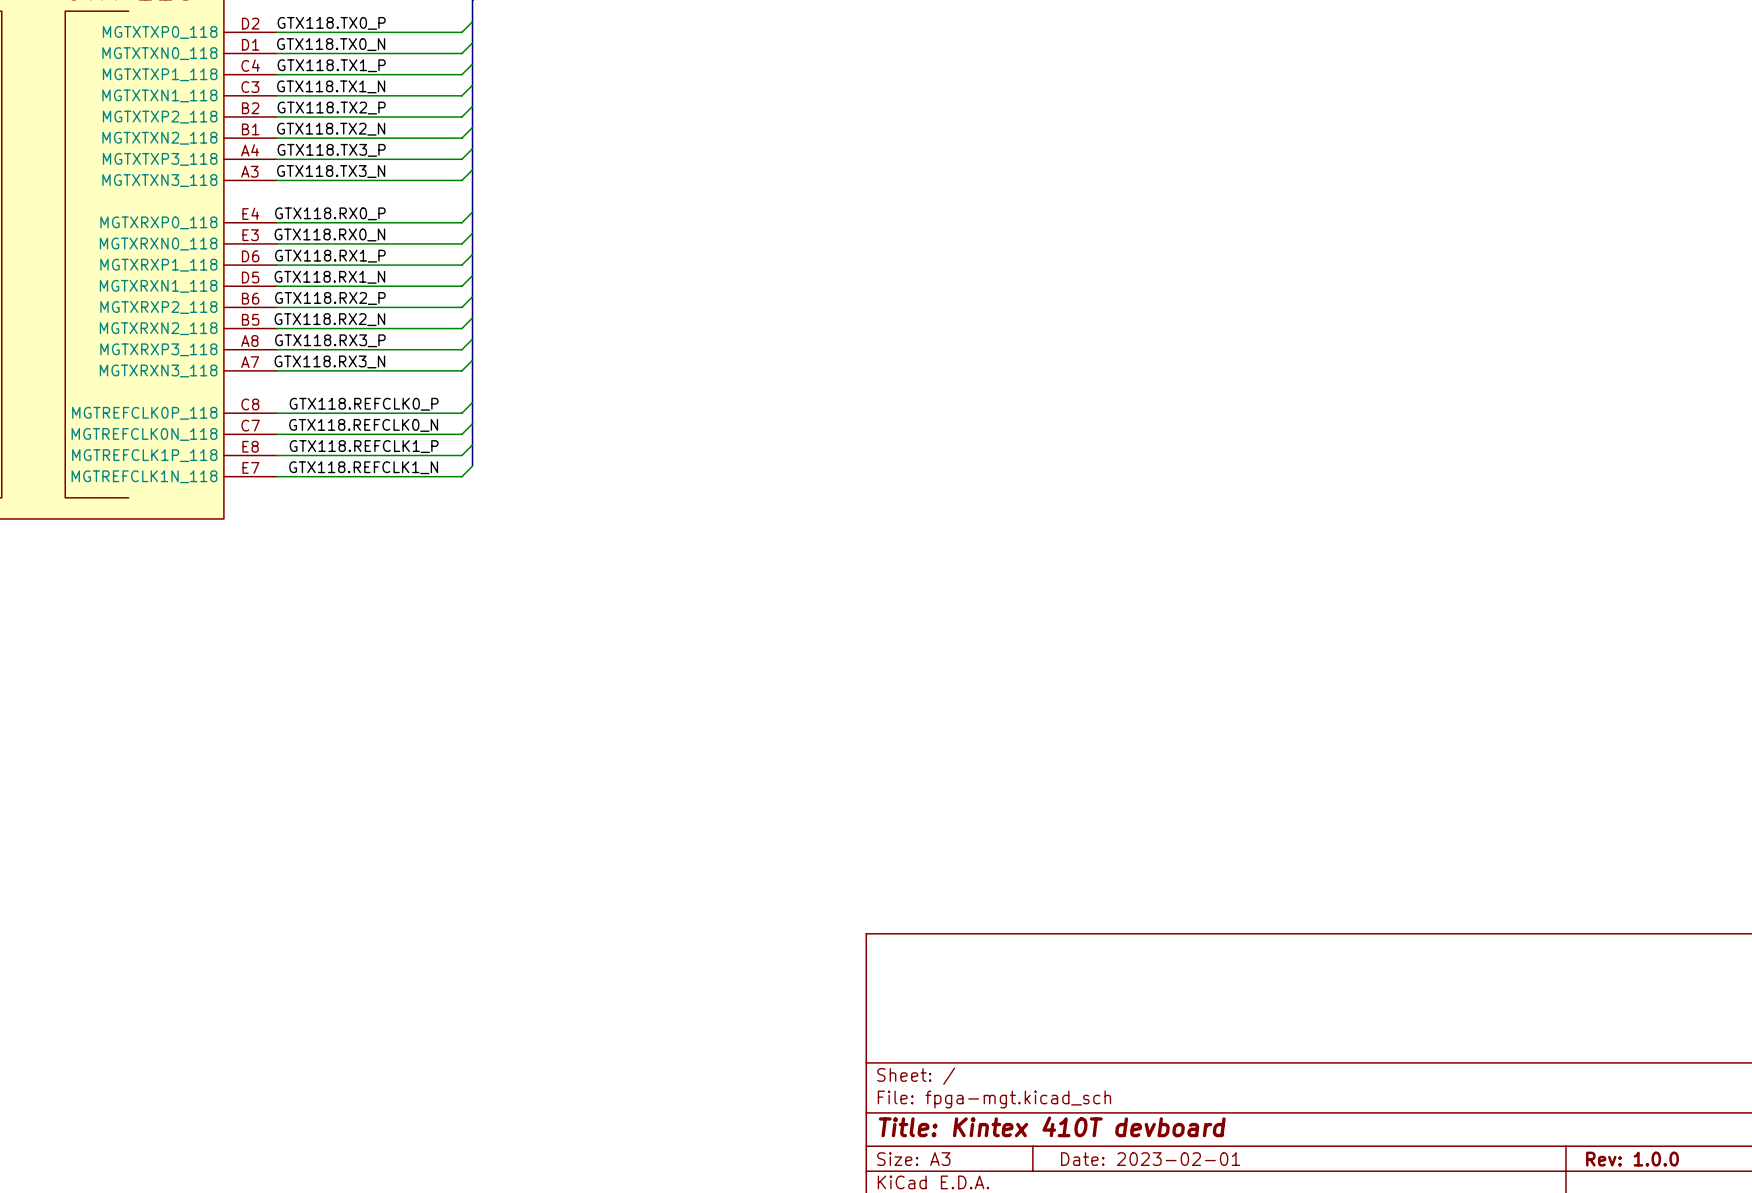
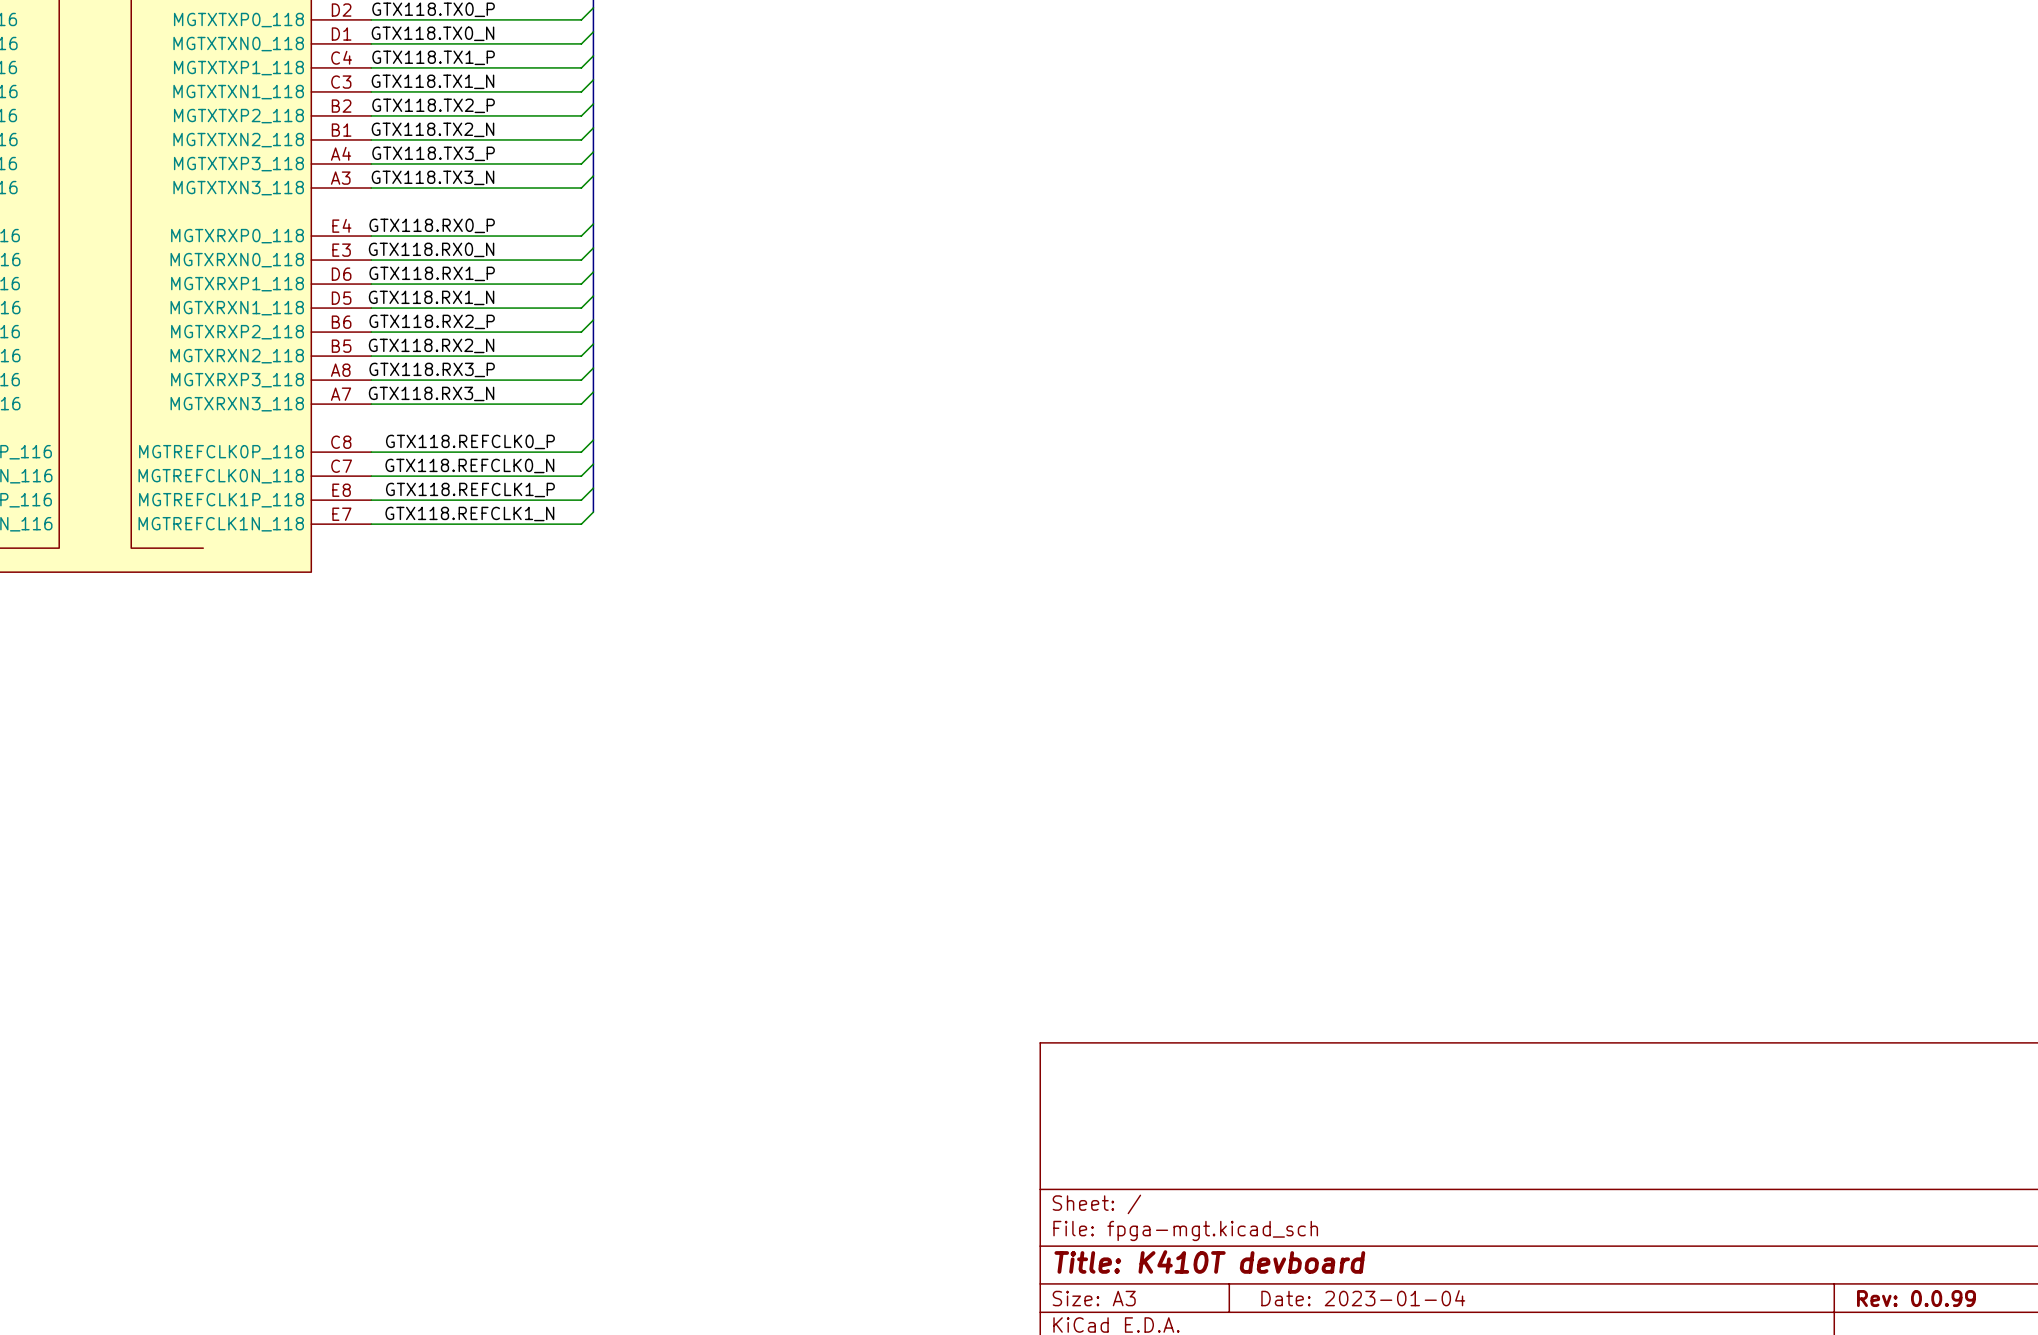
title block: Title: Kintex 410T devboard (1052, 1126) -> Title: K410T devboard (1209, 1261)
title block: Date: 2023-02-01 (1150, 1159) -> Date: 2023-01-04 (1363, 1298)
title block: Rev: 1.0.0 (1632, 1159) -> Rev: 0.0.99 (1916, 1298)

